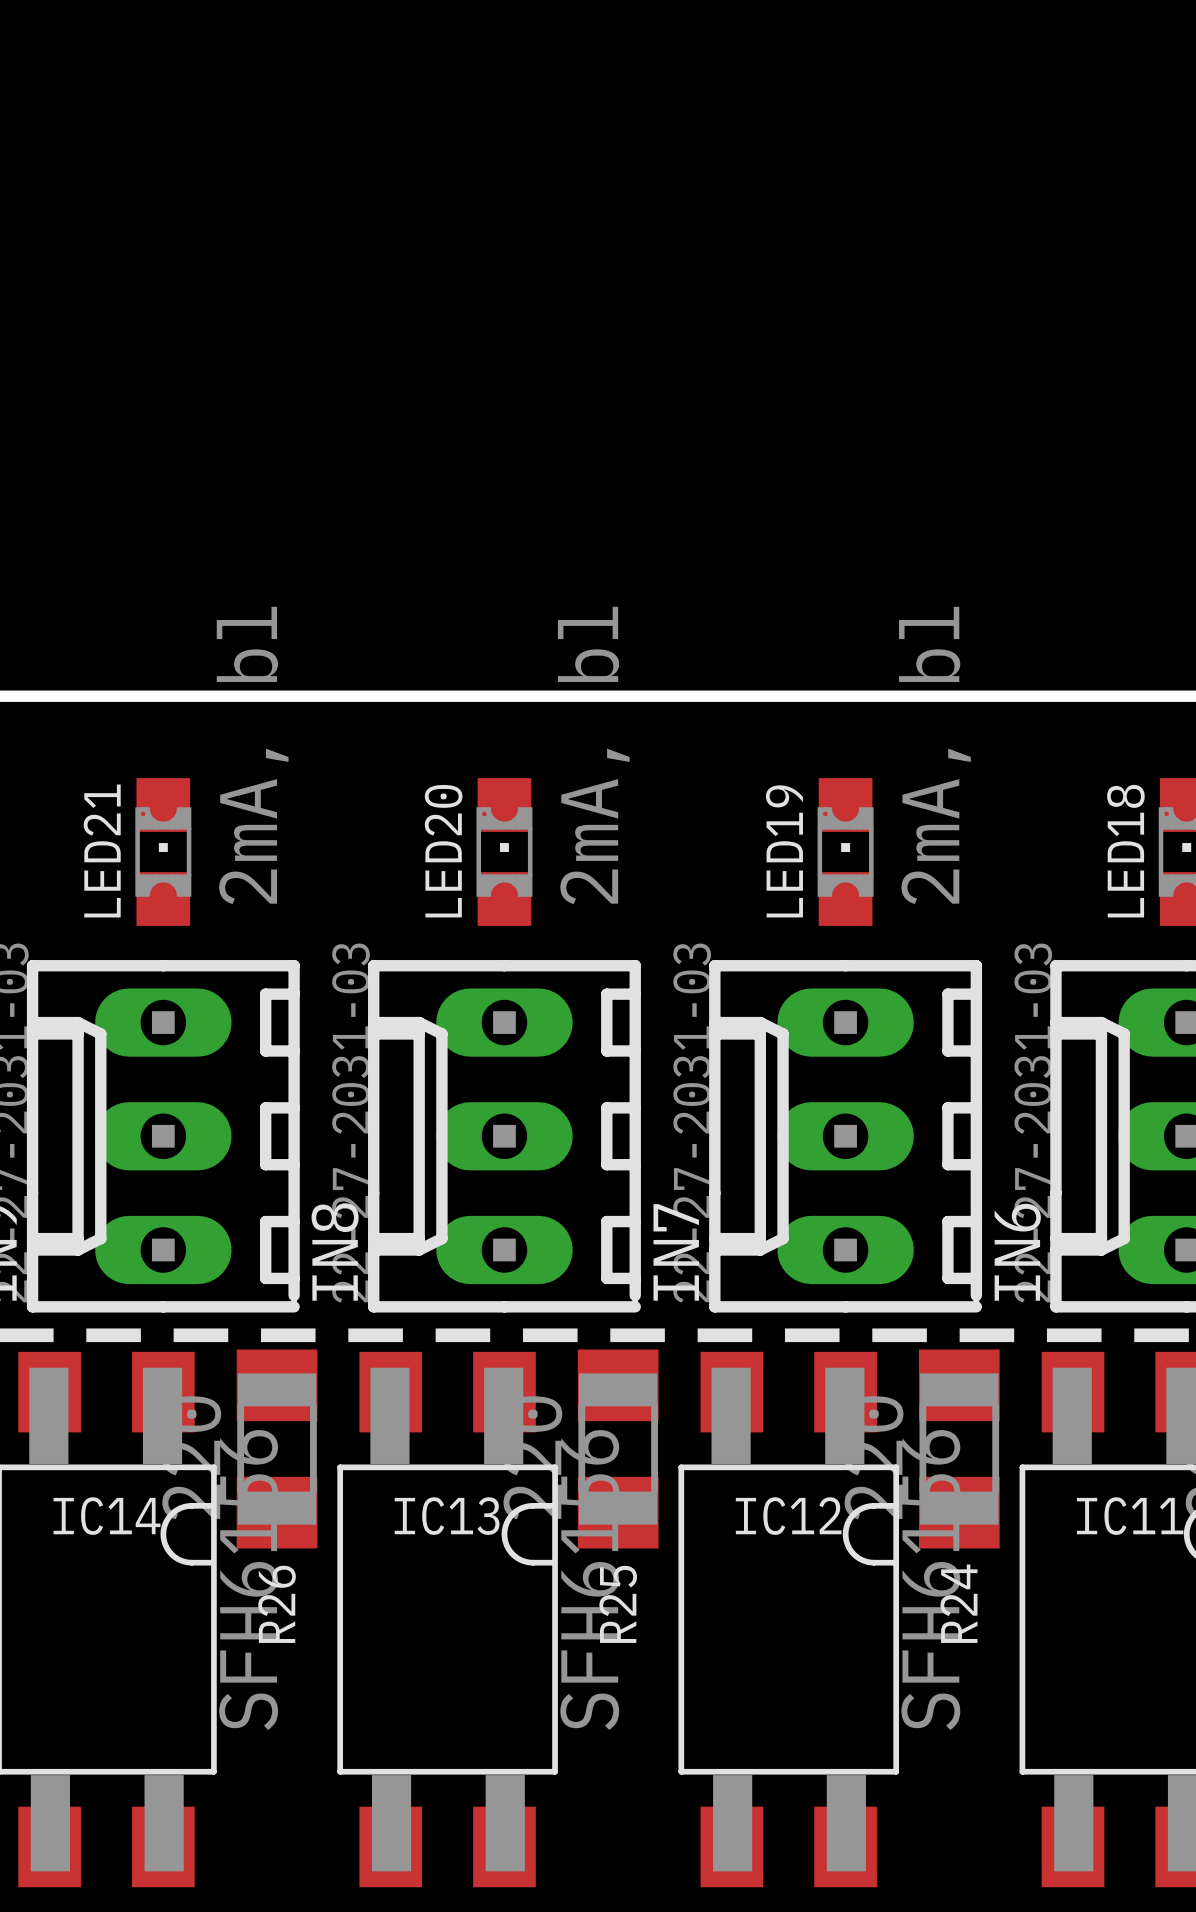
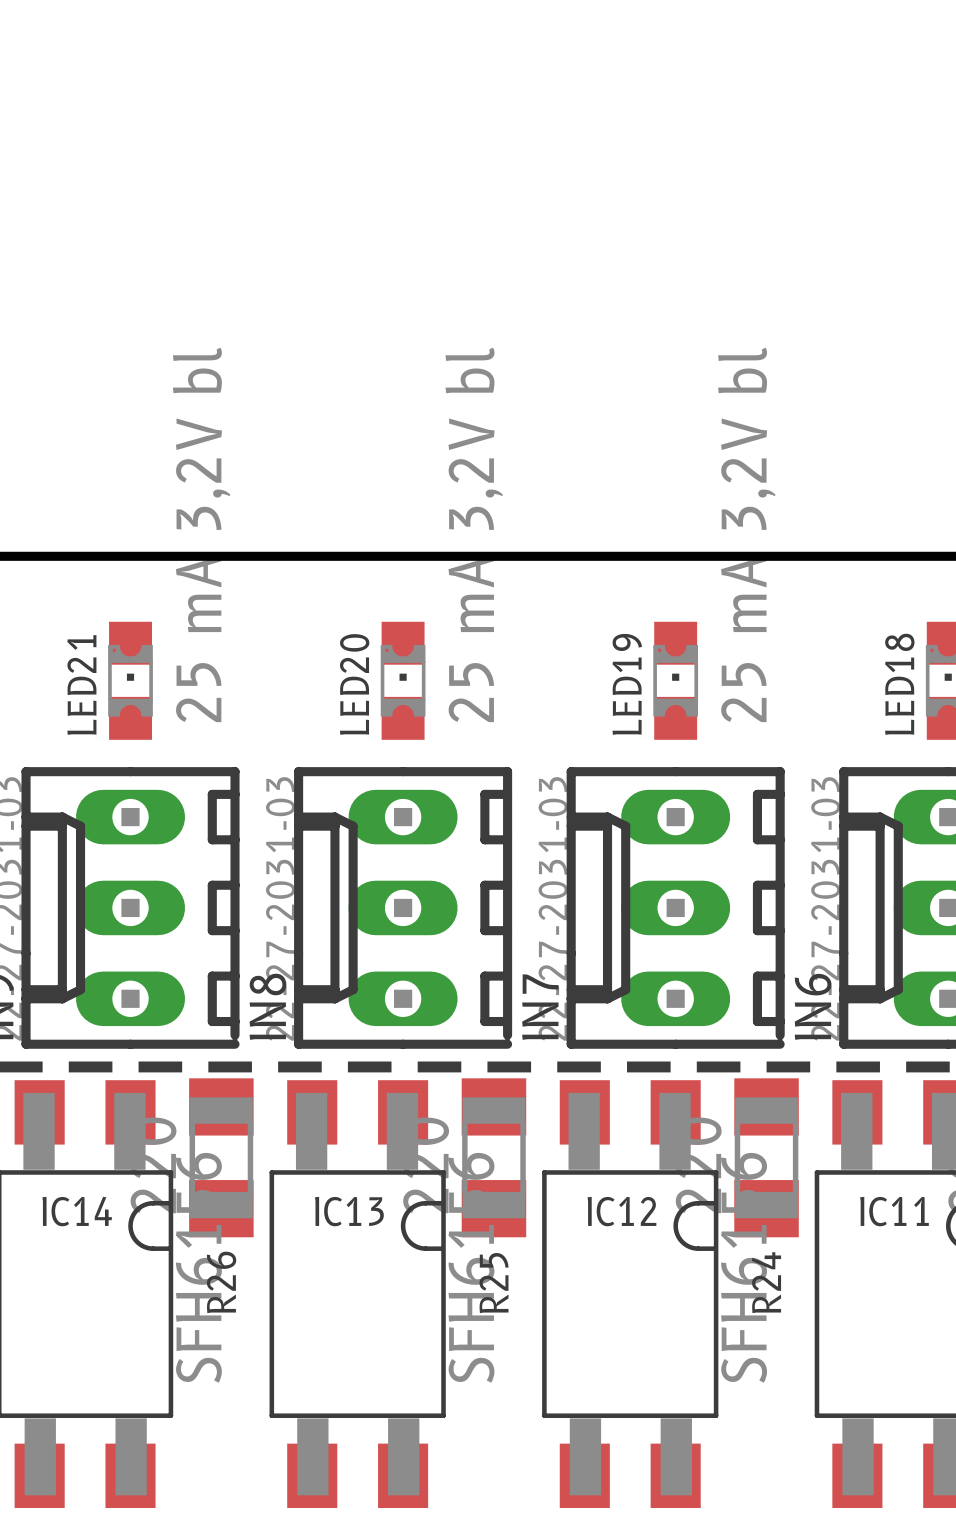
LED21 value: 2mA, bl (252, 755) -> 25 mA 3,2V bl (201, 534)
LED20 value: 2mA, bl (593, 755) -> 25 mA 3,2V bl (474, 534)
LED19 value: 2mA, bl (934, 755) -> 25 mA 3,2V bl (746, 534)

